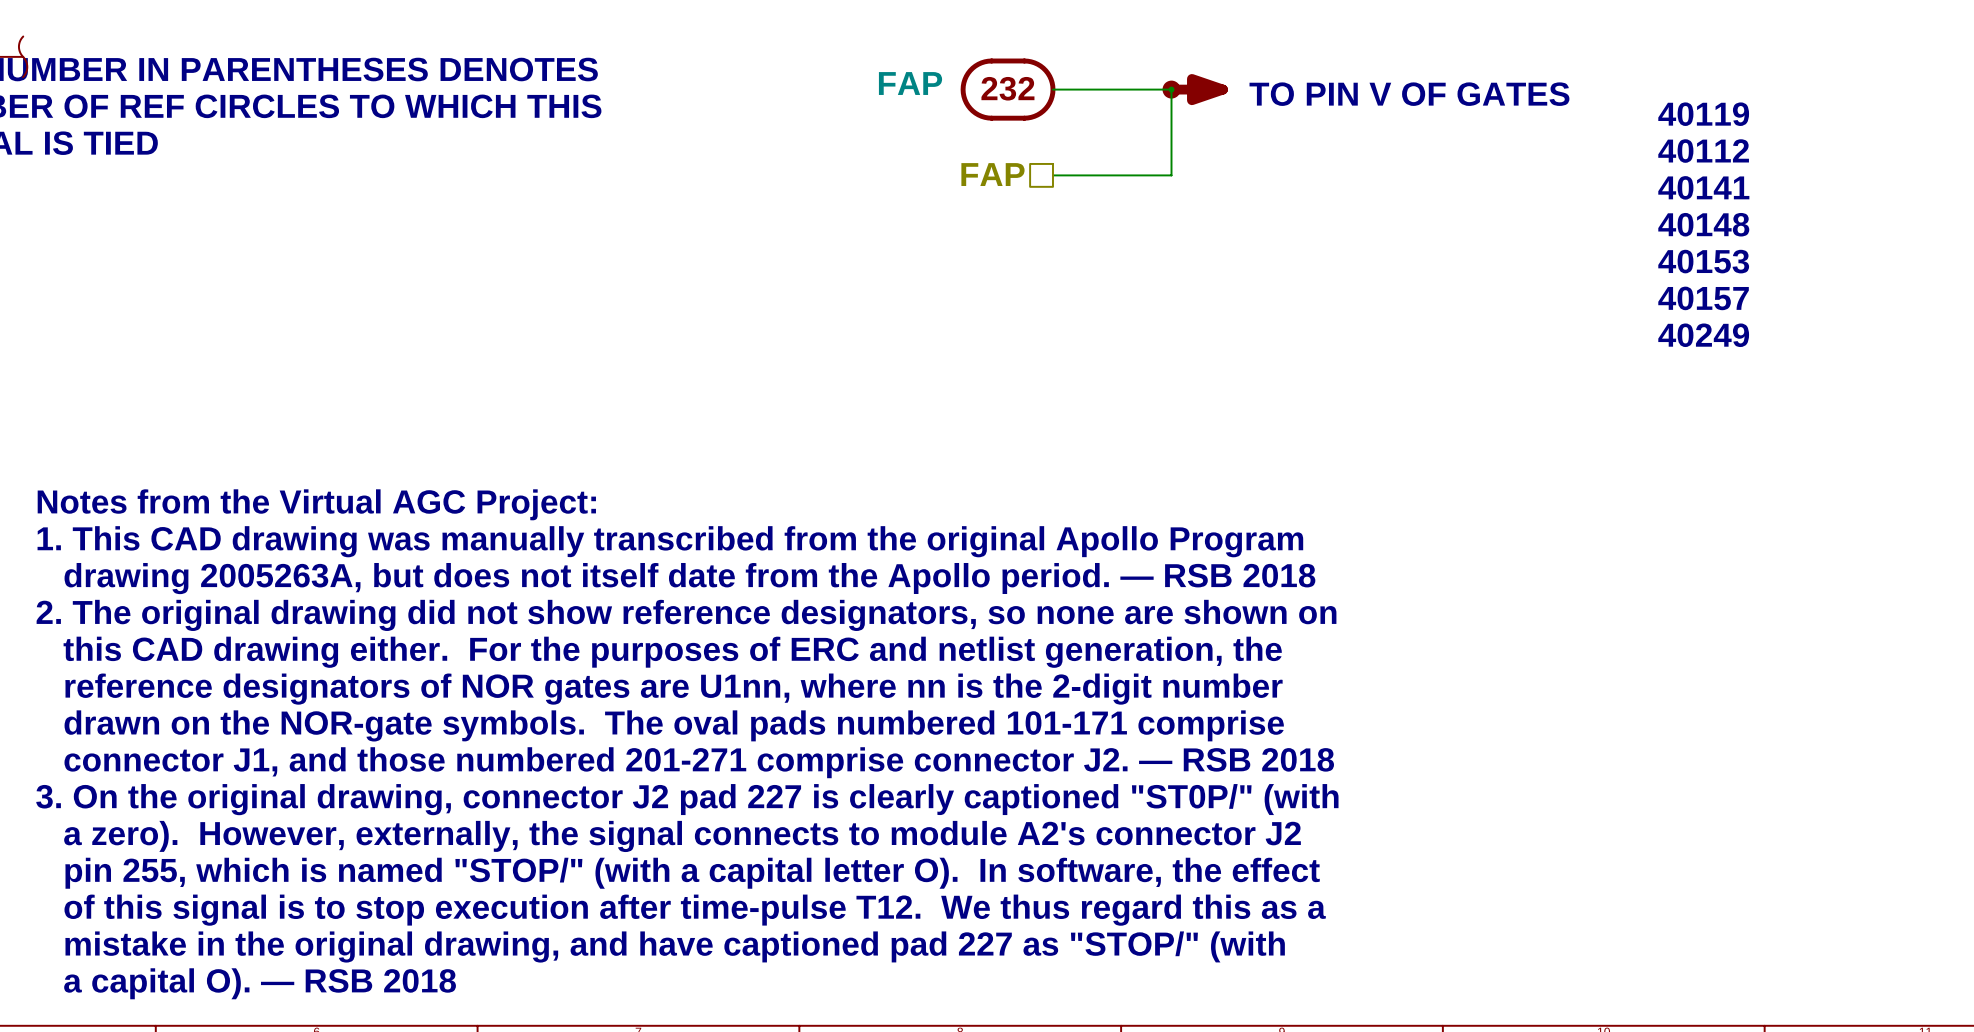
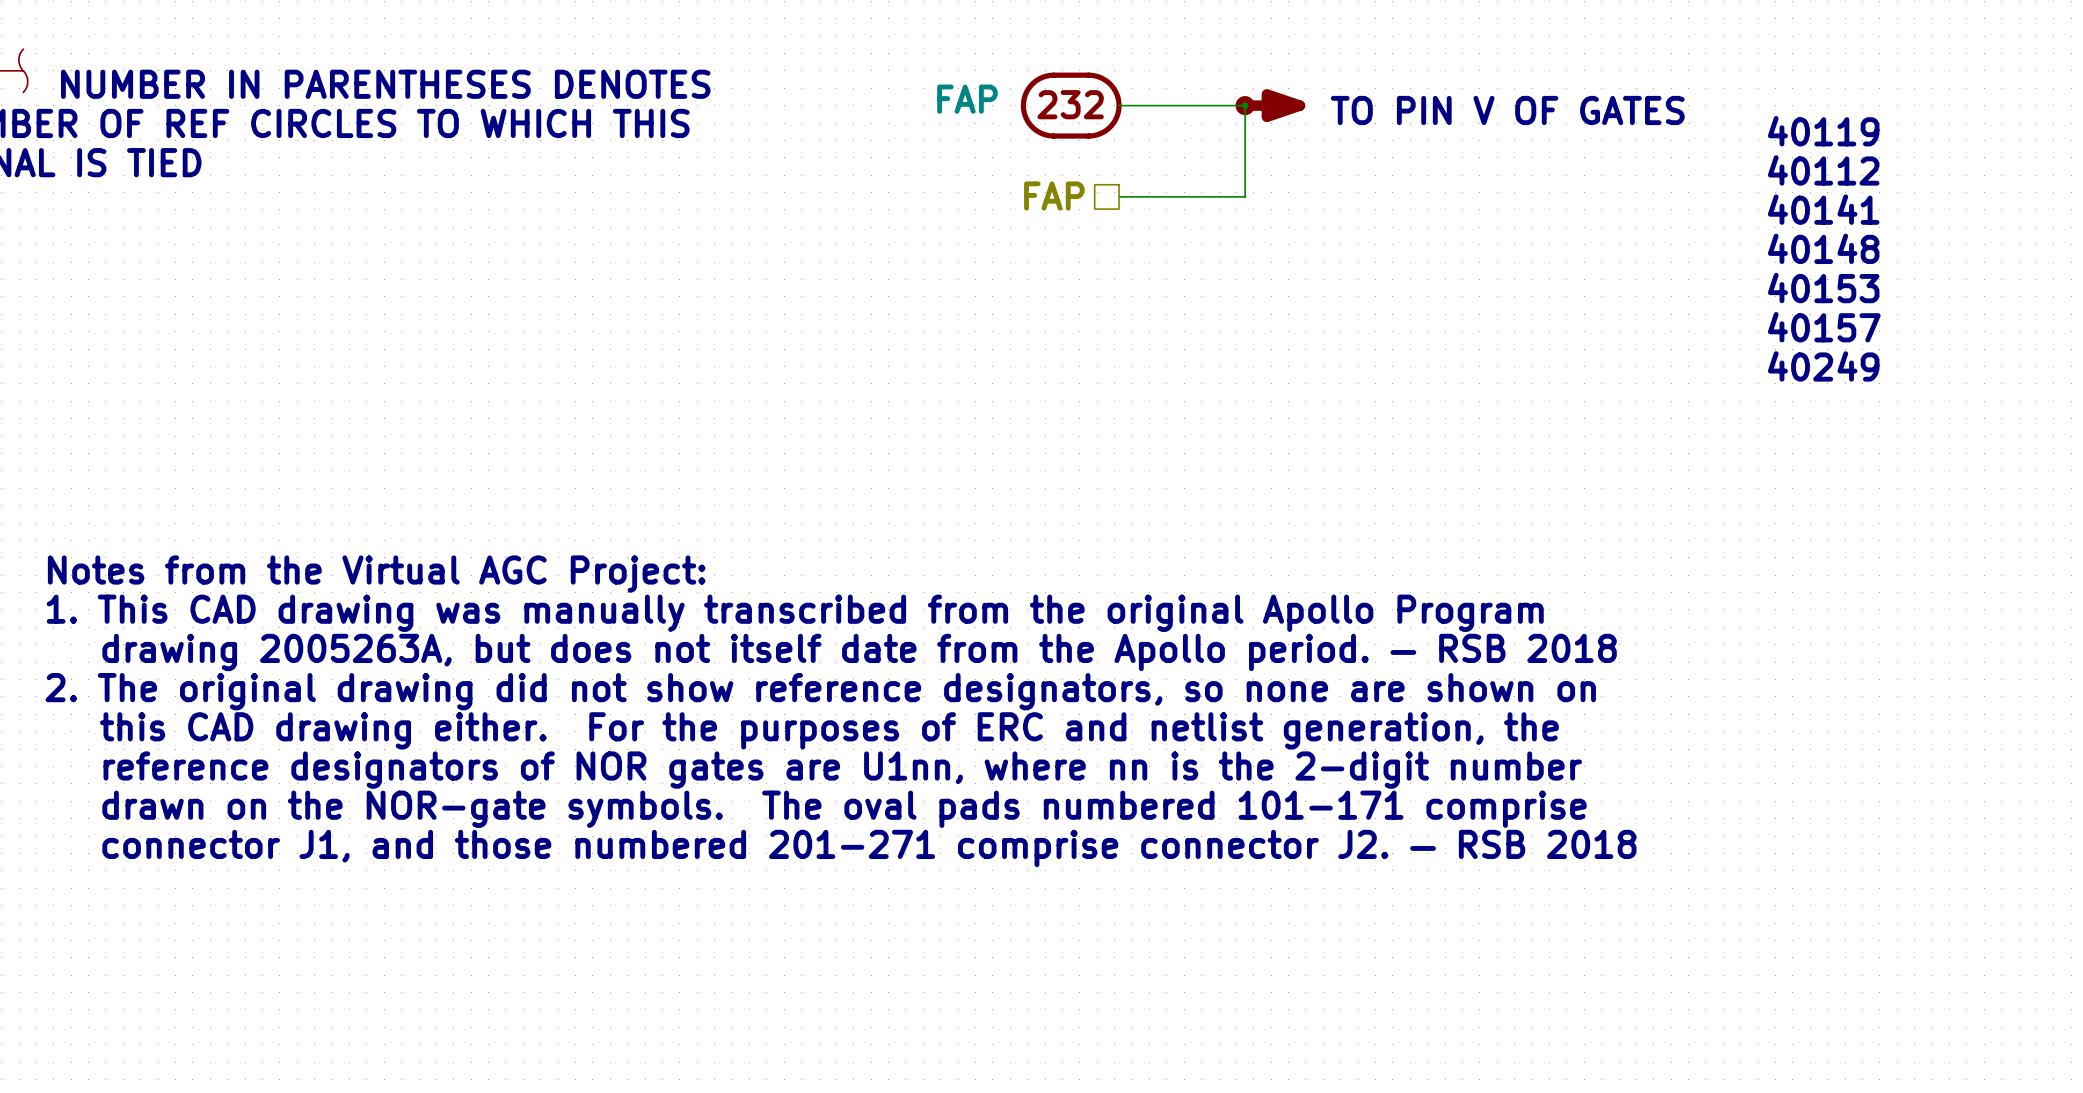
text position: Notes from the Virtual AGC Project: (316, 504) -> Notes from the Virtual AGC Project: (376, 574)
text position: 1. This CAD drawing was manually transcribed from the original Apollo Program (670, 541) -> 1. This CAD drawing was manually transcribed from the original Apollo Program (795, 613)
text position: drawing 2005263A, but does not itself date from the Apollo period. — RSB 2018 (689, 578) -> drawing 2005263A, but does not itself date from the Apollo period. — RSB 2018 (859, 652)
text position: 2. The original drawing did not show reference designators, so none are shown on (686, 615) -> 2. The original drawing did not show reference designators, so none are shown on (820, 691)
text position: this CAD drawing either. For the purposes of ERC and netlist generation, the (672, 652) -> this CAD drawing either. For the purposes of ERC and netlist generation, the (829, 730)
text position: reference designators of NOR gates are U1nn, where nn is the 2-digit number (674, 689) -> reference designators of NOR gates are U1nn, where nn is the 2-digit number (842, 770)
text position: drawn on the NOR-gate symbols. The oval pads numbered 101-171 comprise (674, 725) -> drawn on the NOR-gate symbols. The oval pads numbered 101-171 comprise (844, 809)
text position: connector J1, and those numbered 201-271 comprise connector J2. — RSB 2018 (699, 762) -> connector J1, and those numbered 201-271 comprise connector J2. — RSB 2018 (869, 848)
text: 3. On the original drawing, connector J2 pad 227 is clearly captioned "ST0P/" (with (687, 799) -> none
text: a zero). However, externally, the signal connects to module A2's connector J2 (682, 836) -> none
text: pin 255, which is named "STOP/" (with a capital letter O). In software, the effect (692, 873) -> none
text: of this signal is to stop execution after time-pulse T12. We thus regard this as a (695, 910) -> none
text: mistake in the original drawing, and have captioned pad 227 as "STOP/" (with (675, 947) -> none
text: a capital O). — RSB 2018 (260, 983) -> none

